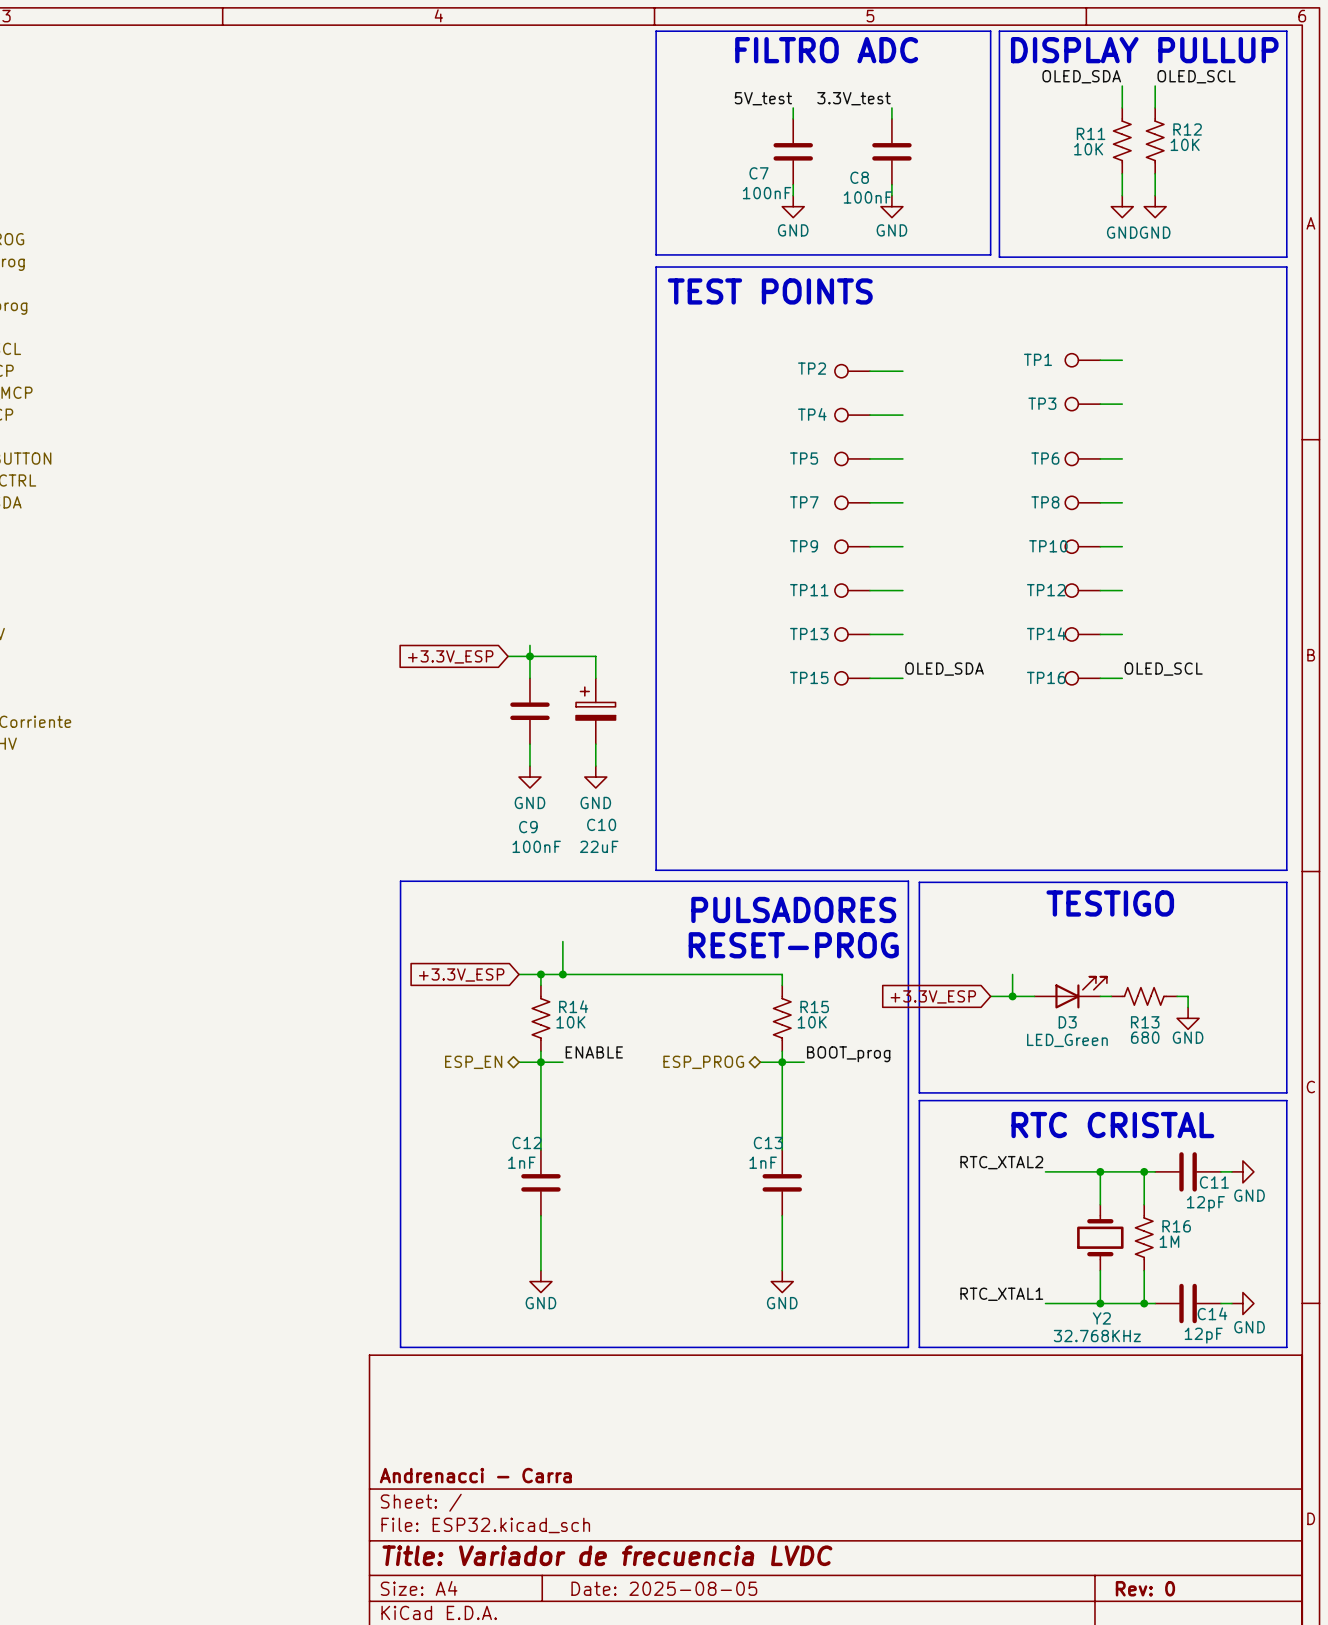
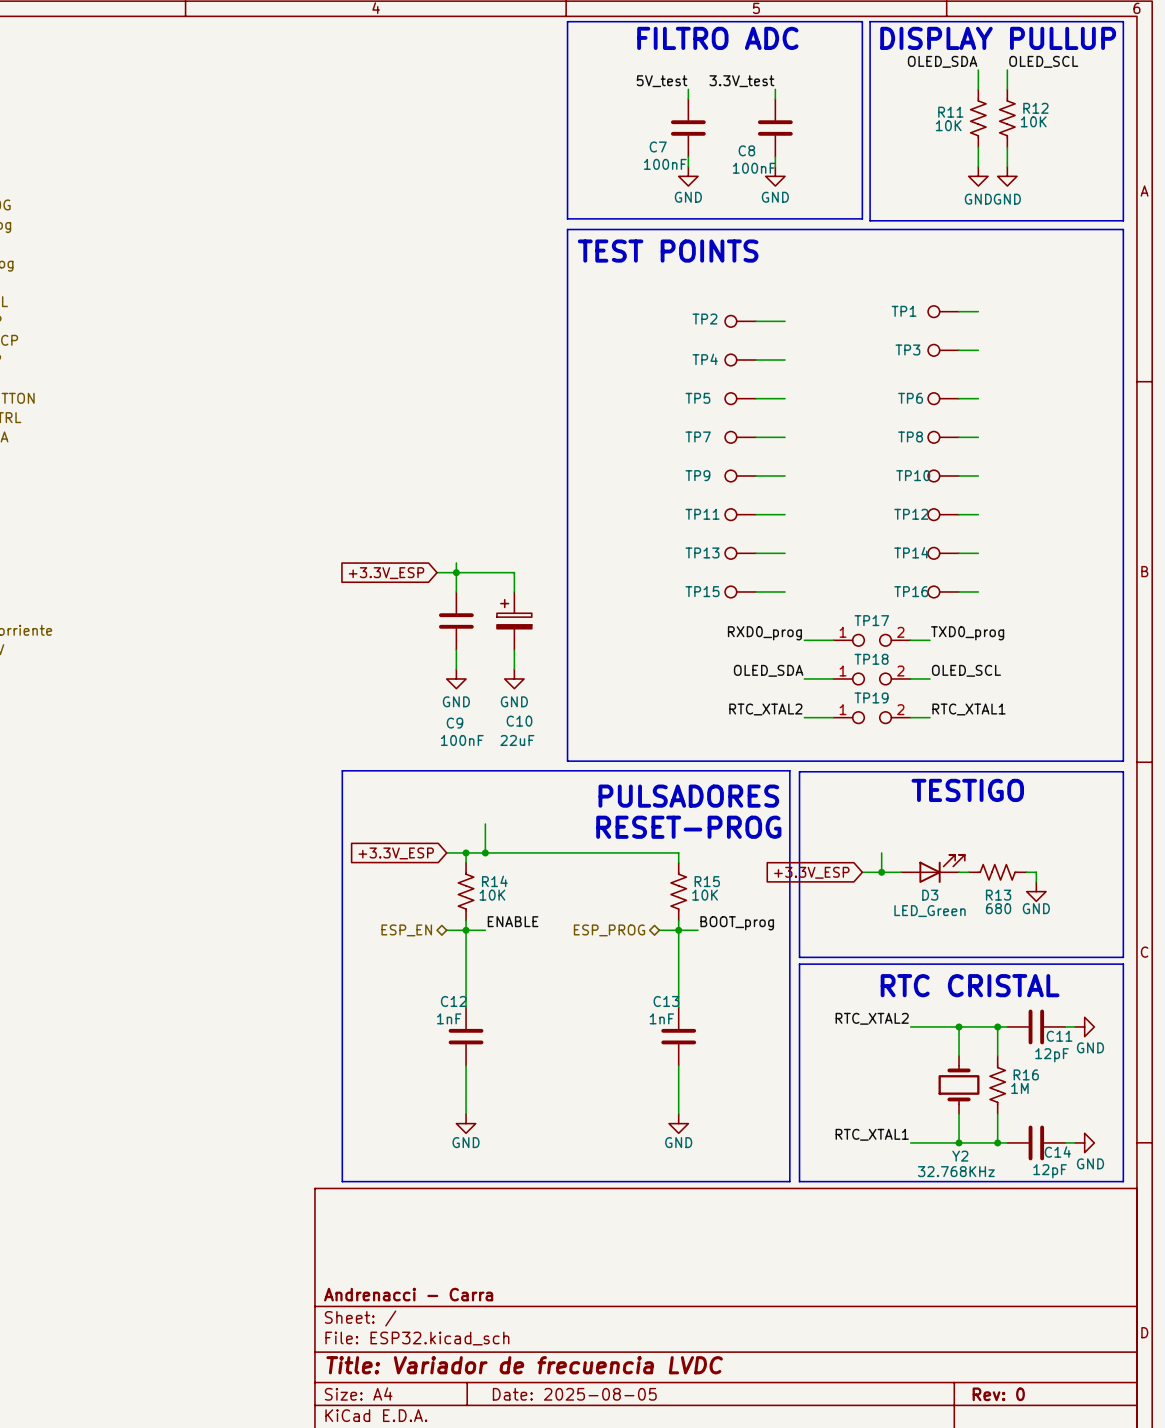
label position: OLED_SDA (944, 669) -> OLED_SDA (768, 670)
label position: OLED_SCL (1163, 669) -> OLED_SCL (966, 670)
label: none -> RXD0_prog (764, 633)
label: none -> TXD0_prog (967, 633)
wire: none -> (804, 640) (833, 640)
TP17: none -> (872, 640)
wire: none -> (910, 640) (930, 640)
wire: none -> (804, 678) (833, 678)
TP18: none -> (872, 678)
wire: none -> (910, 678) (930, 678)
label: none -> RTC_XTAL2 (765, 709)
label: none -> RTC_XTAL1 (968, 709)
wire: none -> (804, 717) (833, 717)
TP19: none -> (872, 717)
wire: none -> (910, 717) (930, 717)

